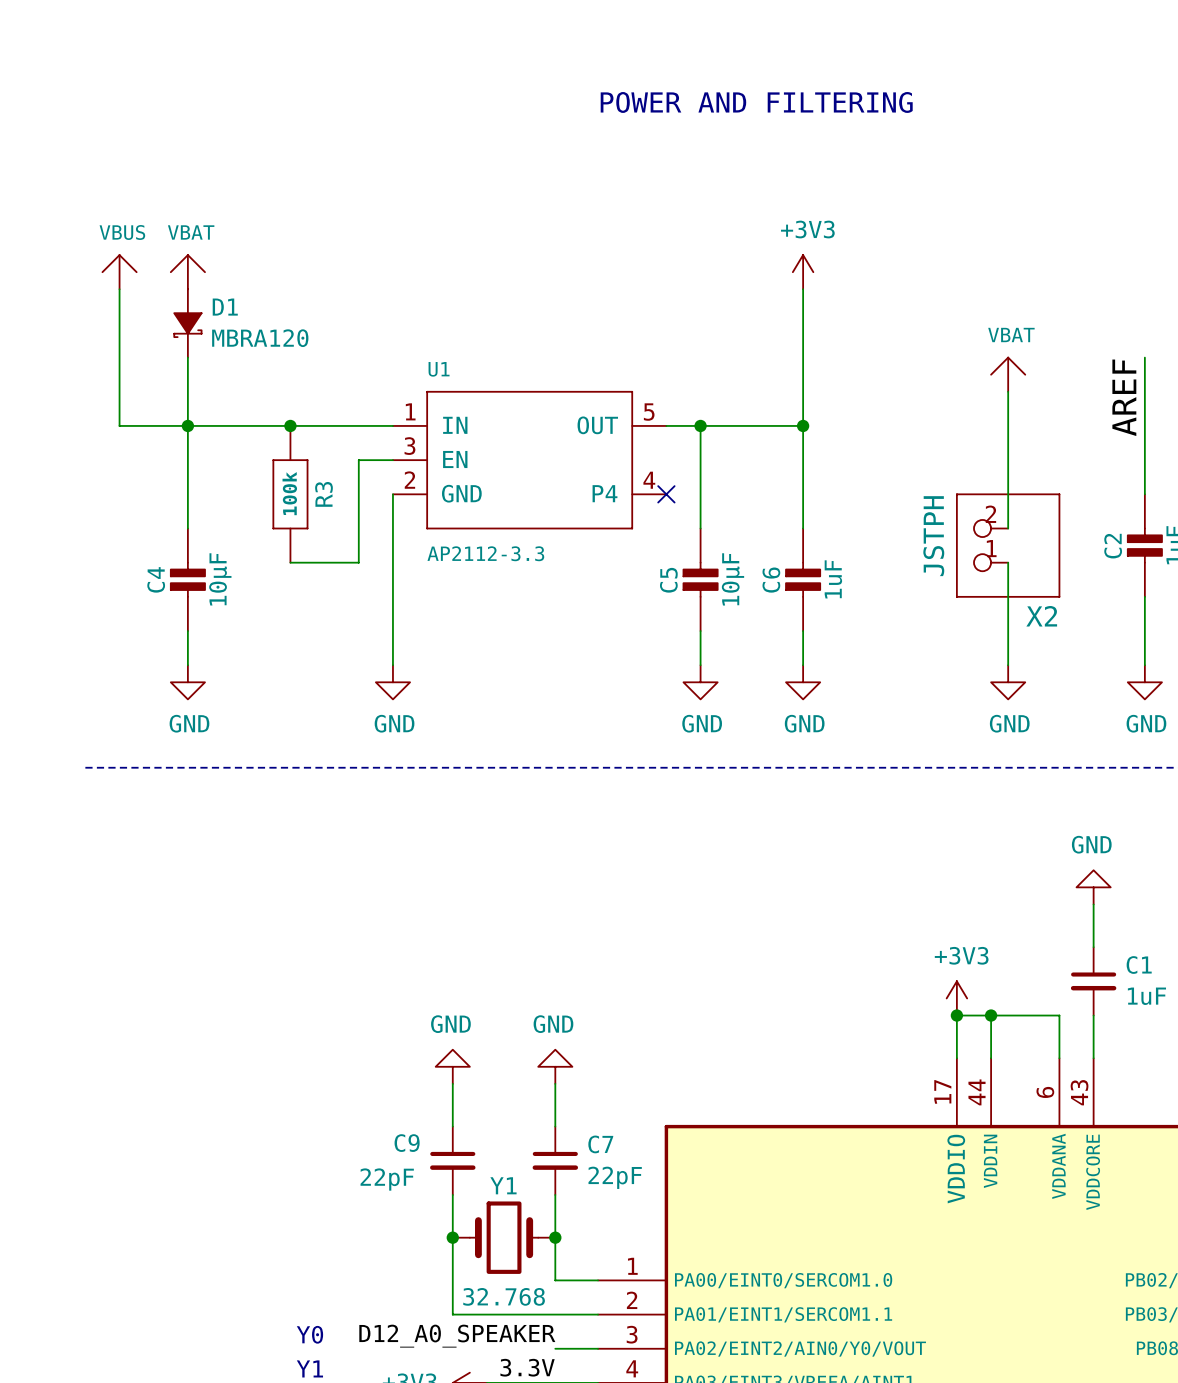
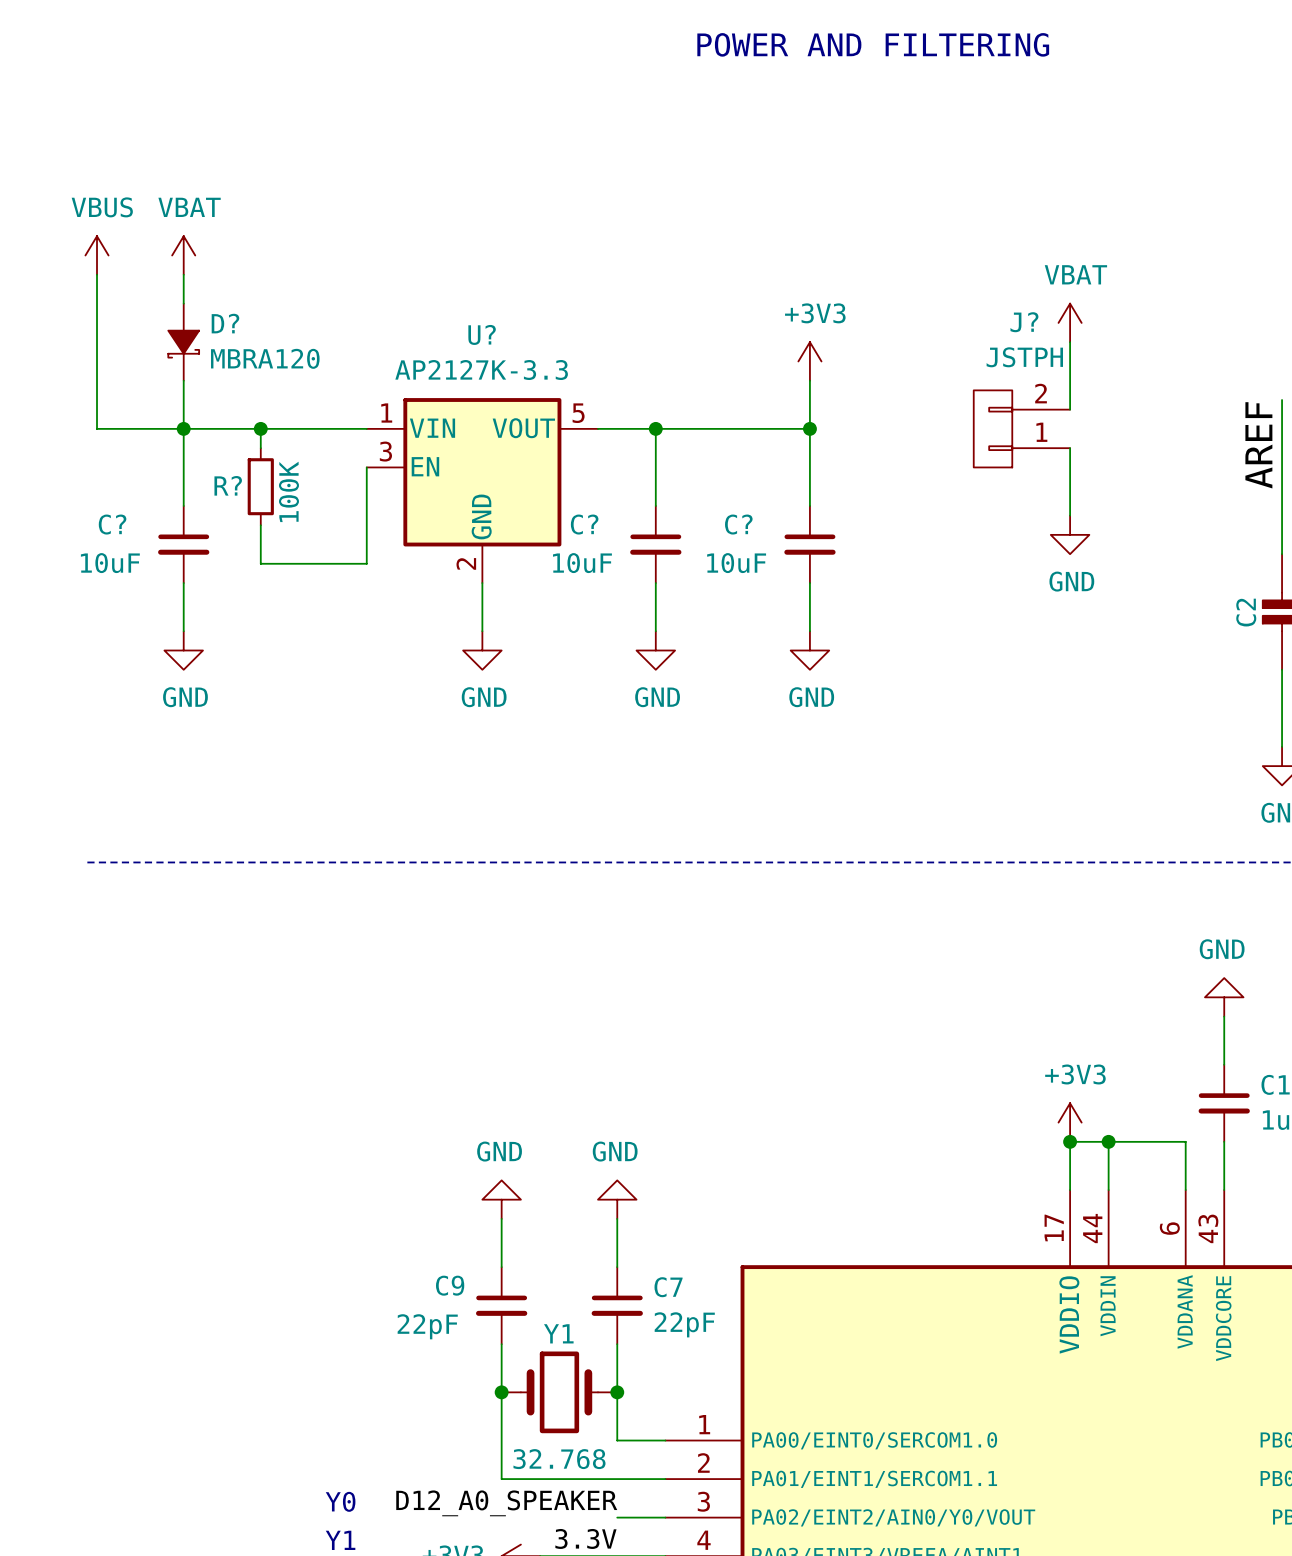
text position: POWER AND FILTERING (756, 102) -> POWER AND FILTERING (873, 44)
power symbol: none -> VBUS (97, 255)
power symbol: none -> VBAT (183, 255)
wire: none -> (97, 274) (97, 428) (366, 428)
wire: none -> (183, 274) (183, 303)
power symbol: VBUS (119, 272) -> none
power symbol: VBAT (187, 272) -> none
power symbol position: +3V3 (803, 272) -> +3V3 (809, 361)
wire: (119, 289) (119, 425) (392, 425) -> none
wire: (803, 289) (803, 528) -> none
power symbol: none -> VBAT (1070, 322)
D?: none -> MBRA120 (183, 342)
wire: none -> (1070, 342) (1070, 409)
D1: MBRA120 (187, 323) -> none
wire: none -> (183, 380) (183, 505)
wire: none -> (809, 380) (809, 505)
wire: (187, 357) (187, 528) -> none
power symbol: VBAT (1008, 374) -> none
junction: none -> (183, 428)
wire: none -> (260, 428) (260, 448)
junction: none -> (260, 428)
wire: none -> (597, 428) (809, 428)
wire: none -> (655, 428) (655, 505)
junction: none -> (655, 428)
junction: none -> (809, 428)
J?: none -> JSTPH (1021, 428)
wire: (1008, 391) (1008, 528) -> none
wire: none -> (1070, 448) (1070, 515)
wire: none -> (366, 467) (366, 563) (260, 563) (260, 525)
junction: (187, 425) -> none
junction: (290, 425) -> none
wire: (666, 425) (803, 425) -> none
wire: (700, 425) (700, 528) -> none
junction: (700, 425) -> none
junction: (803, 425) -> none
R?: none -> 100K (260, 486)
U?: none -> AP2127K-3.3 (482, 490)
wire: (392, 460) (358, 460) (358, 562) (290, 562) -> none
U1: AP2112-3.3 (529, 460) -> none
power symbol: none -> GND (1070, 534)
C?: none -> 10uF (183, 544)
C?: none -> 10uF (655, 544)
C?: none -> 10uF (809, 544)
R3: 100k (290, 494) -> none
wire: (392, 494) (392, 665) -> none
no-connect mark: (666, 494) -> none
wire: none -> (183, 583) (183, 631)
wire: none -> (482, 583) (482, 631)
wire: none -> (655, 583) (655, 631)
wire: none -> (809, 583) (809, 631)
X2: JSTPH (1008, 545) -> none
wire: (1008, 562) (1008, 665) -> none
C4: 10µF (187, 579) -> none
power symbol: none -> GND (482, 650)
power symbol: none -> GND (655, 650)
C5: 10µF (700, 579) -> none
power symbol: none -> GND (809, 650)
C6: 1uF (803, 579) -> none
wire: (187, 631) (187, 665) -> none
wire: (700, 631) (700, 665) -> none
wire: (803, 631) (803, 665) -> none
power symbol position: GND (187, 682) -> GND (183, 650)
power symbol: GND (392, 682) -> none
power symbol: GND (700, 682) -> none
power symbol: GND (803, 682) -> none
power symbol: GND (1008, 682) -> none

